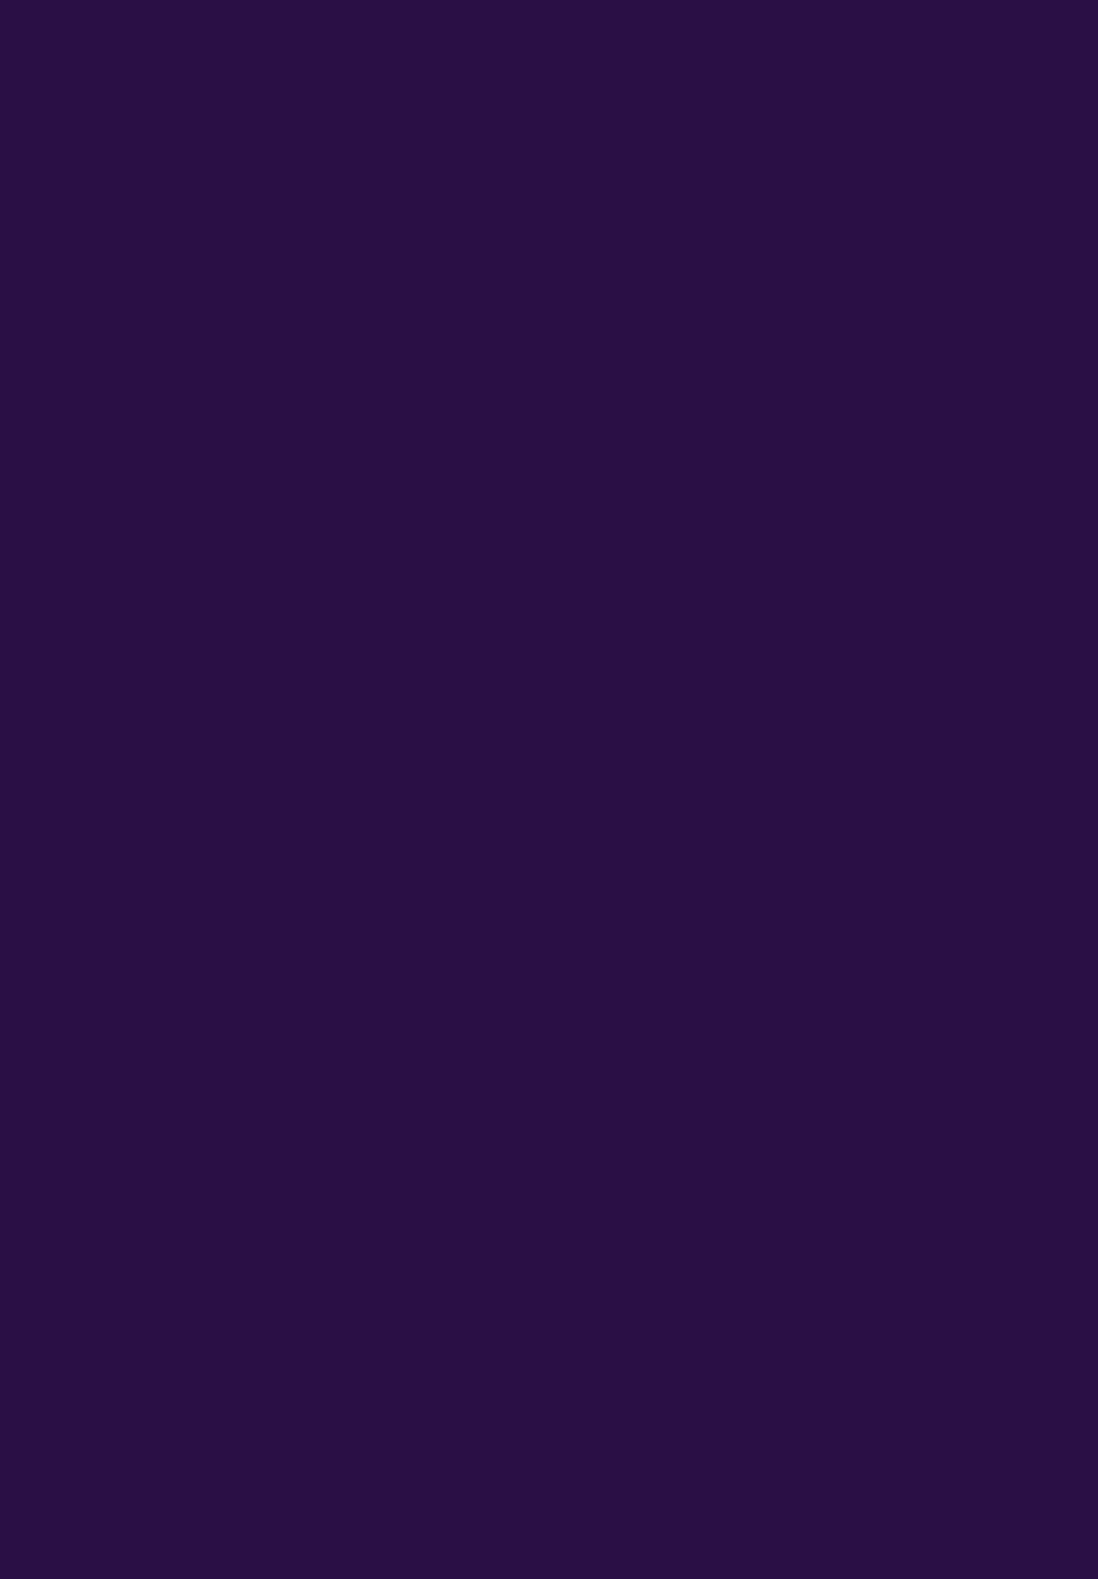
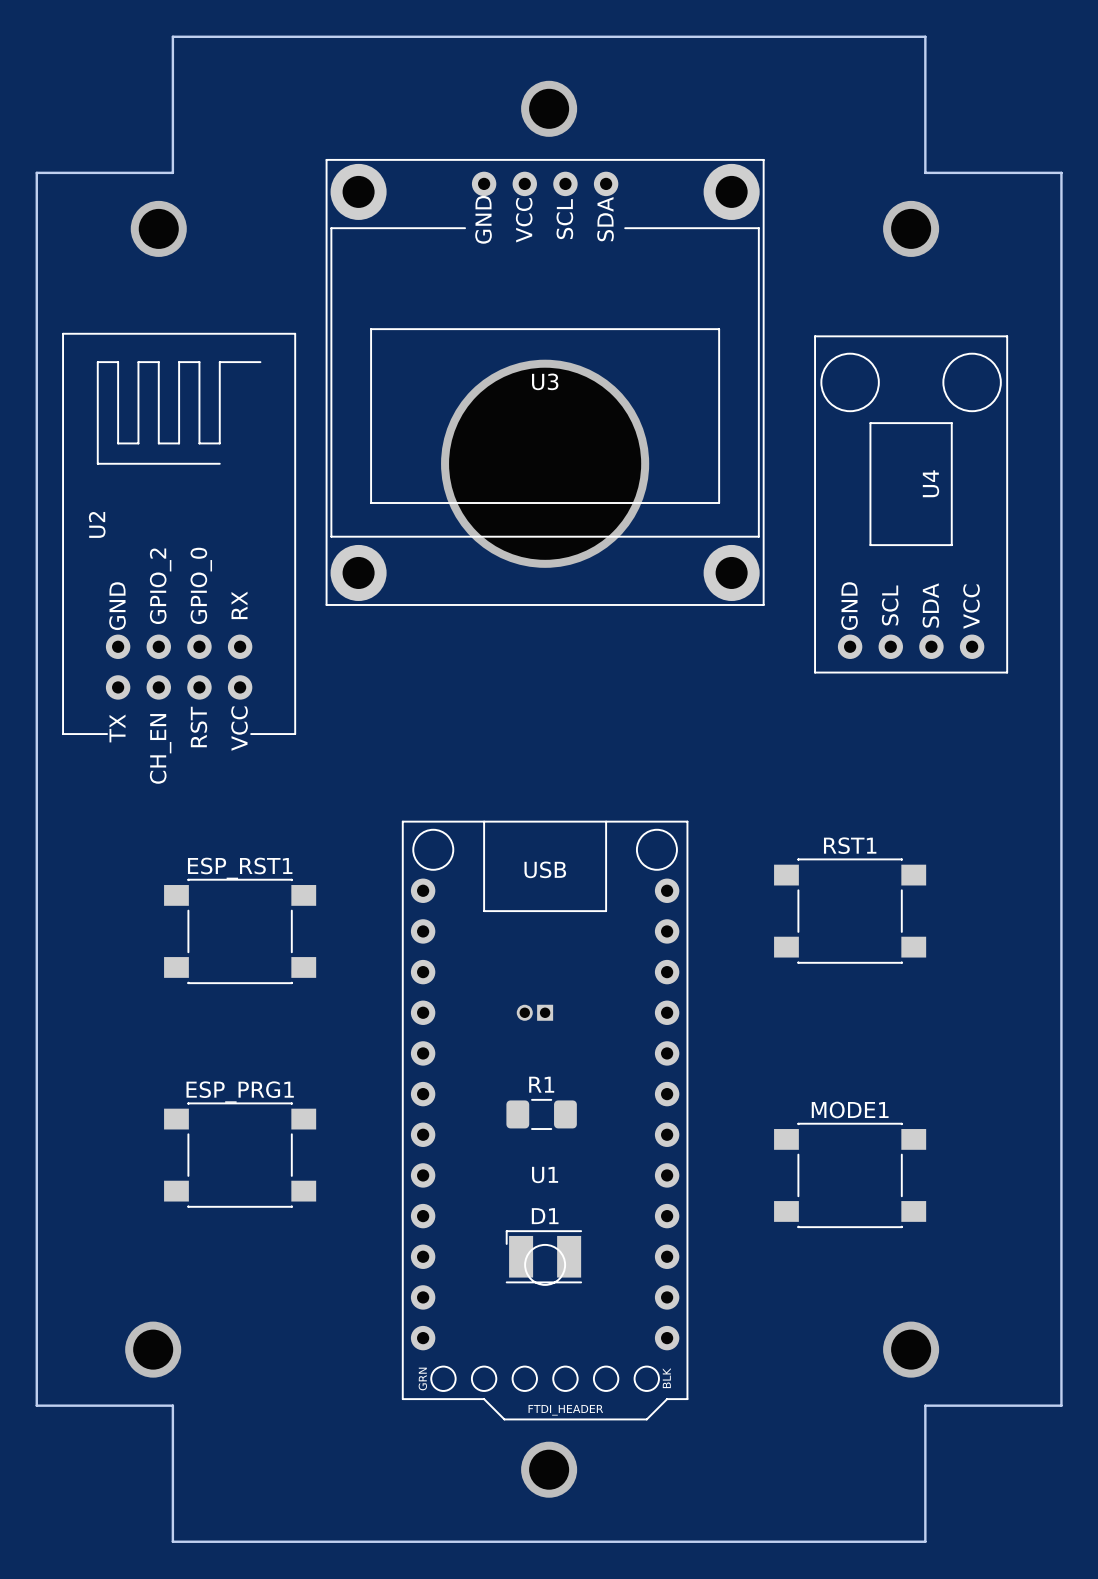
board edge: none -> (172, 36) (925, 36) (925, 172) (1061, 172) (1061, 1405) (925, 1405) (925, 1541) (172, 1541) (172, 1405) (36, 1405) (36, 172) (172, 172) (172, 36)
via: none -> (549, 108)
via: none -> (158, 228)
via: none -> (911, 228)
U3: none -> (545, 382)
via: none -> (545, 463)
U4: none -> (911, 504)
U2: none -> (179, 533)
RST1: none -> (850, 911)
ESP_RST1: none -> (240, 931)
part: none -> (534, 1012)
R1: none -> (541, 1114)
U1: none -> (545, 1120)
ESP_PRG1: none -> (240, 1155)
MODE1: none -> (850, 1175)
D1: none -> (543, 1256)
via: none -> (153, 1349)
via: none -> (911, 1349)
via: none -> (549, 1469)

